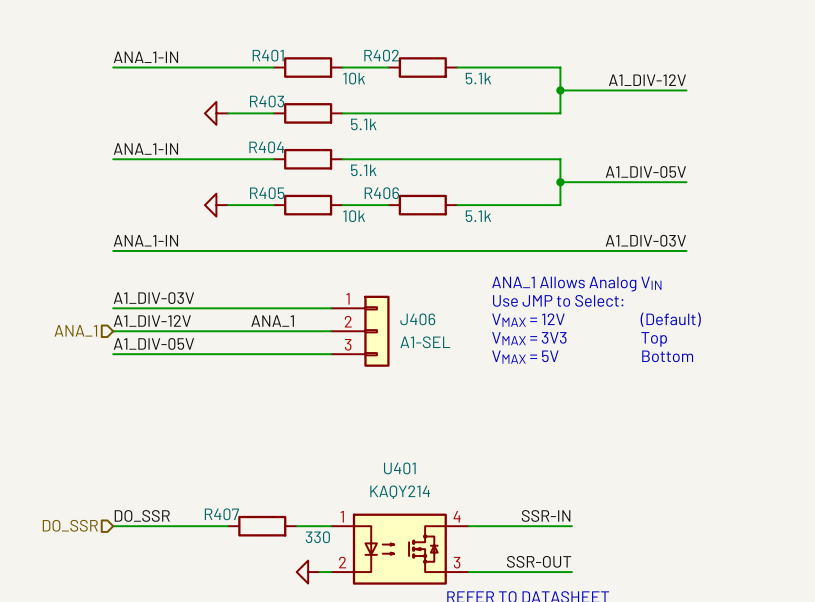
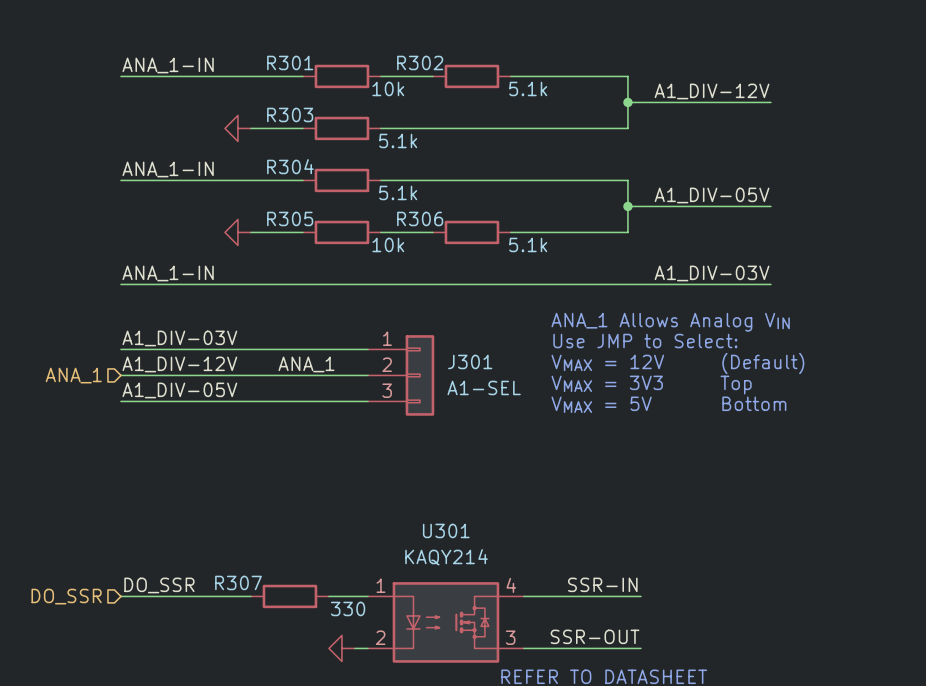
R401 name: R401 (268, 55) -> R301 (290, 62)
R402 name: R402 (381, 55) -> R302 (420, 62)
R403 name: R403 (267, 101) -> R303 (290, 114)
R404 name: R404 (266, 147) -> R304 (290, 166)
R405 name: R405 (267, 193) -> R305 (290, 218)
R406 name: R406 (381, 193) -> R306 (420, 218)
J406 name: J406 (417, 319) -> J301 (470, 361)
U401 name: U401 (399, 468) -> U301 (446, 530)
R407 name: R407 (221, 514) -> R307 (238, 582)

